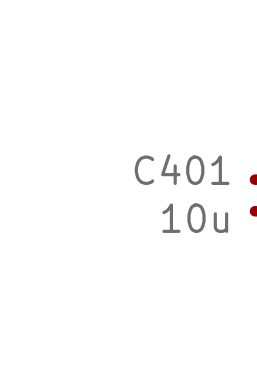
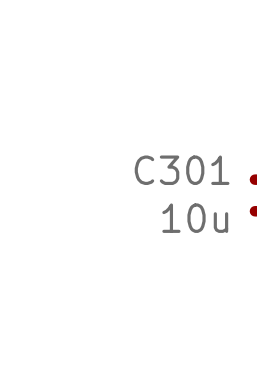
C401 name: C401 (182, 169) -> C301 (182, 170)

